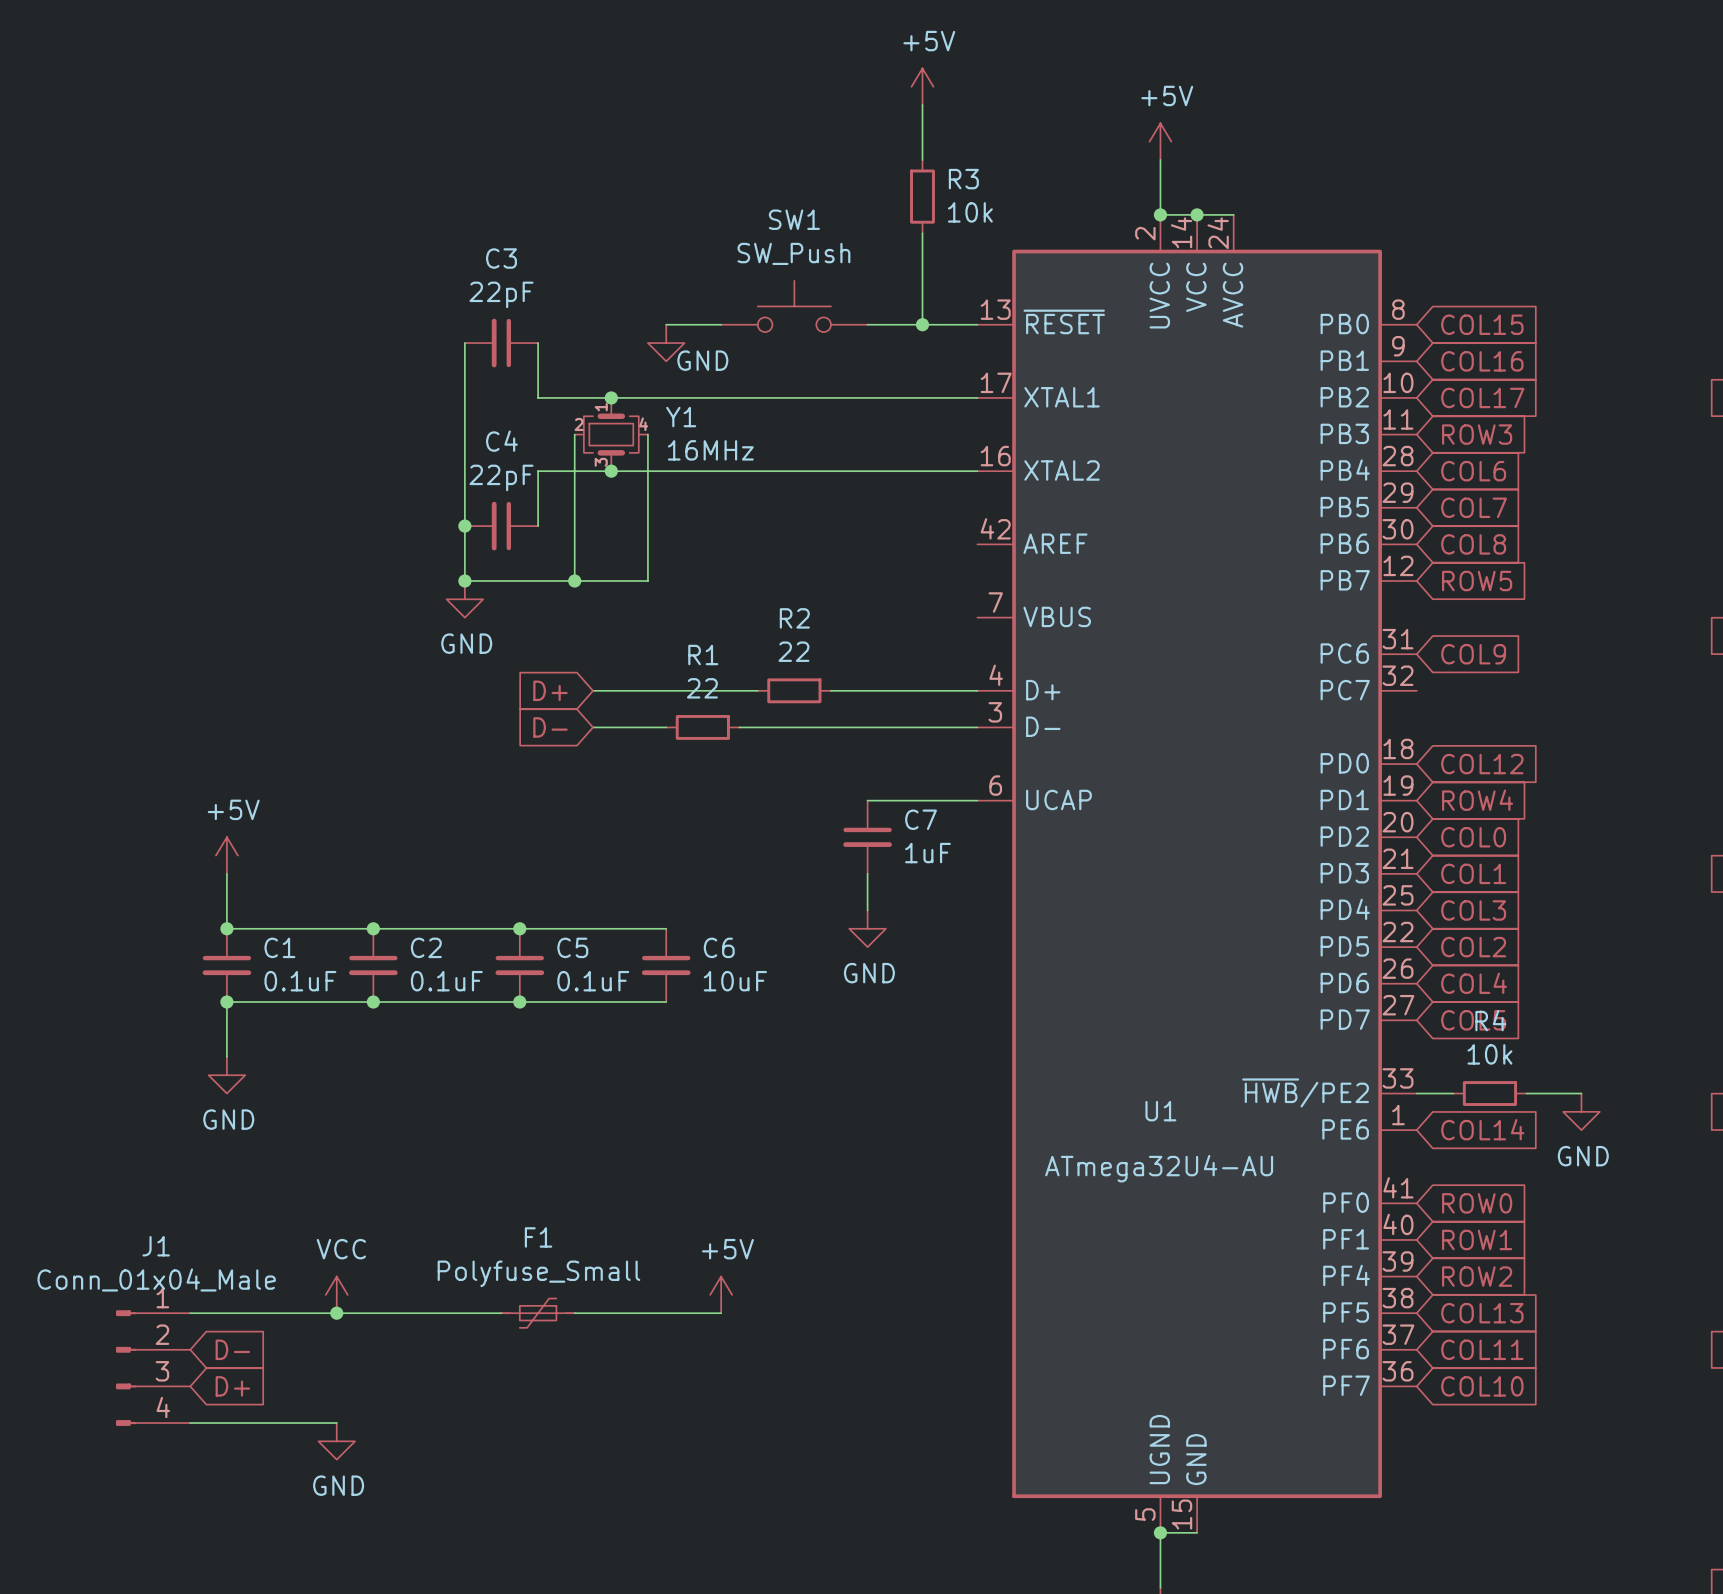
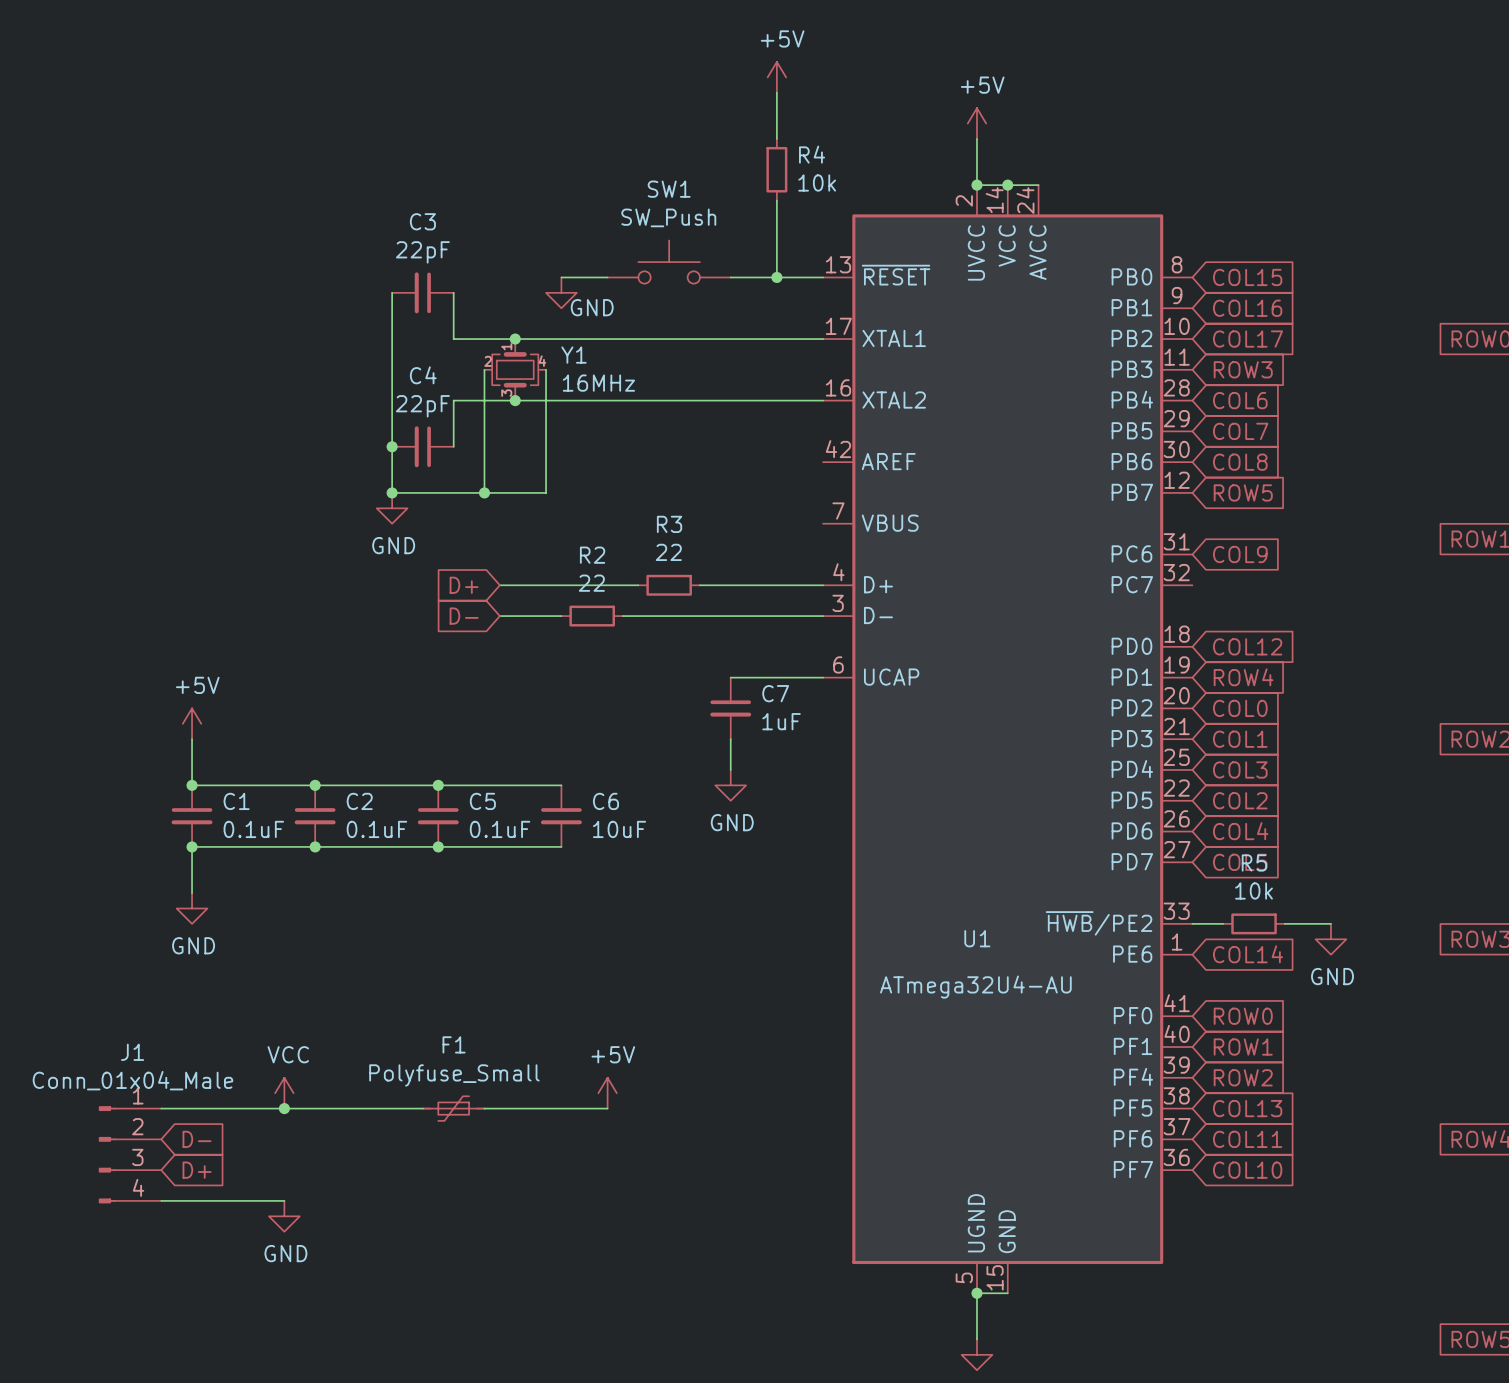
R3 name: R3 (963, 179) -> R4 (812, 154)
R2 name: R2 (794, 618) -> R3 (669, 524)
R1 name: R1 (703, 655) -> R2 (592, 555)
R4 name: R4 (1490, 1020) -> R5 (1254, 862)

